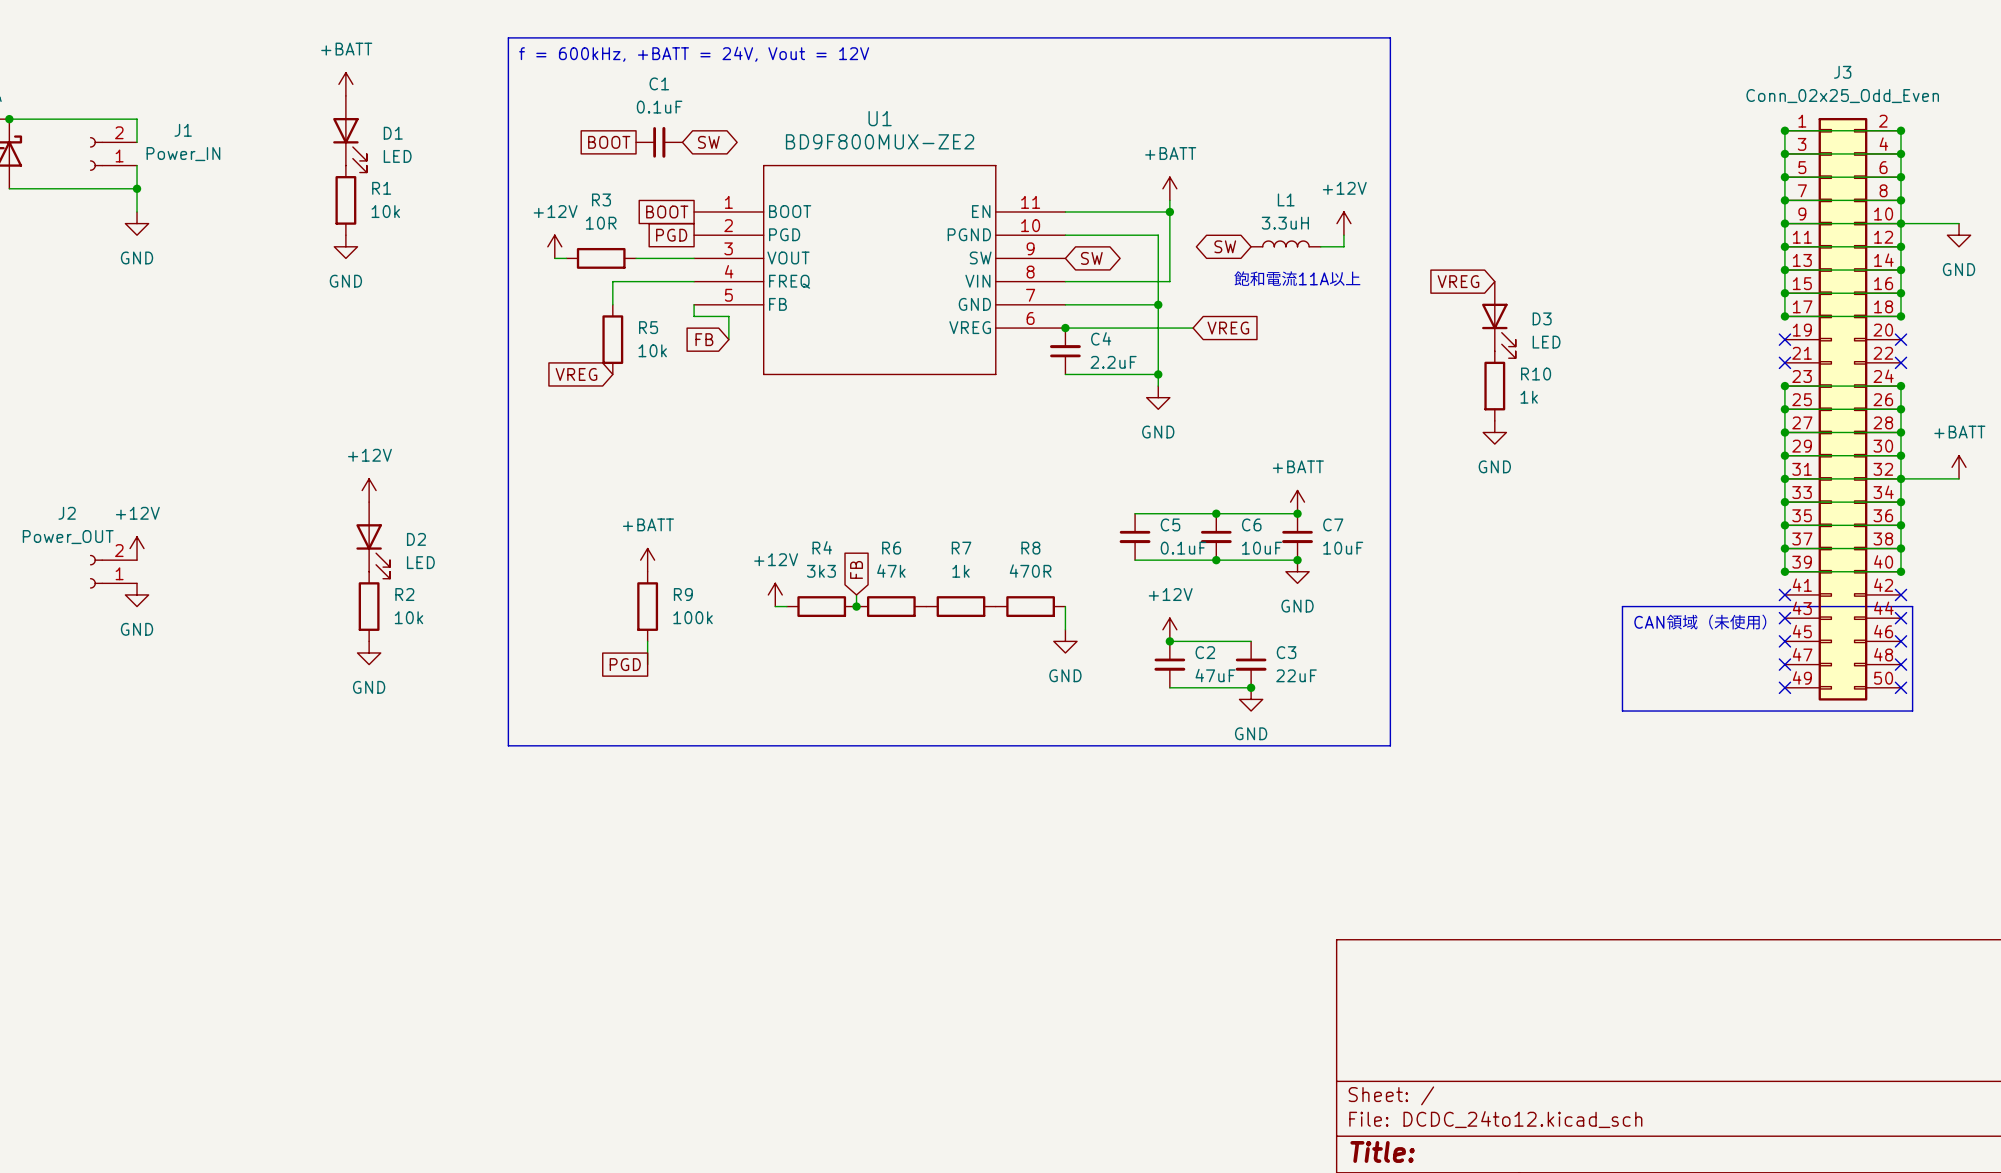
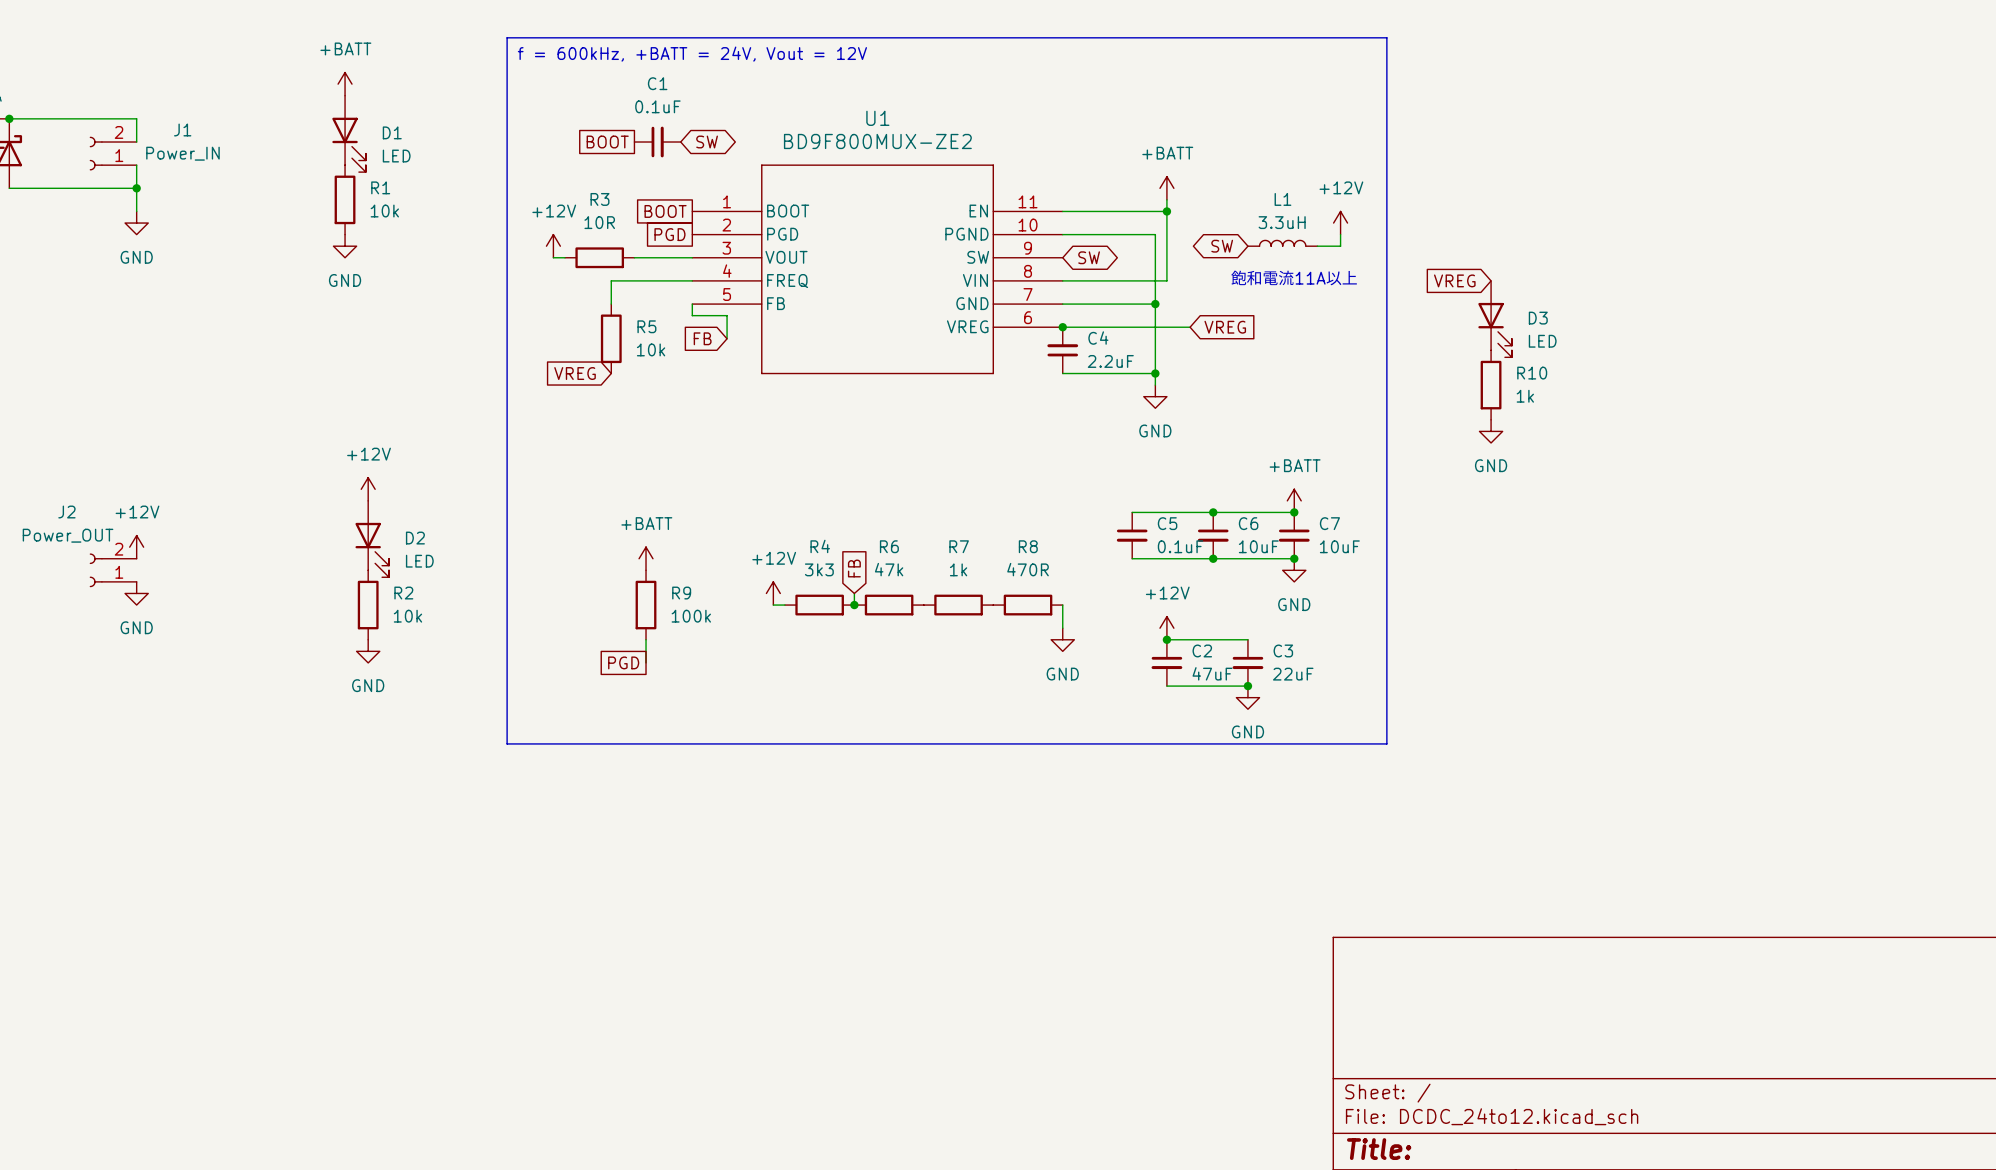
wire: (1784, 130) (1784, 316) (1900, 316) (1900, 130) (1784, 130) -> none
junction: (1784, 130) -> none
junction: (1900, 130) -> none
wire: (1784, 153) (1900, 153) -> none
junction: (1784, 153) -> none
junction: (1900, 153) -> none
wire: (1784, 177) (1900, 177) -> none
junction: (1784, 177) -> none
junction: (1900, 177) -> none
wire: (1784, 200) (1900, 200) -> none
junction: (1784, 200) -> none
junction: (1900, 200) -> none
wire: (1784, 223) (1959, 223) -> none
junction: (1784, 223) -> none
junction: (1900, 223) -> none
power symbol: GND (1959, 235) -> none
wire: (1784, 246) (1900, 246) -> none
junction: (1784, 246) -> none
junction: (1900, 246) -> none
wire: (1784, 270) (1900, 270) -> none
junction: (1784, 270) -> none
junction: (1900, 270) -> none
wire: (1784, 293) (1900, 293) -> none
junction: (1784, 293) -> none
junction: (1900, 293) -> none
junction: (1784, 316) -> none
junction: (1900, 316) -> none
no-connect mark: (1784, 339) -> none
no-connect mark: (1900, 339) -> none
no-connect mark: (1784, 362) -> none
no-connect mark: (1900, 362) -> none
wire: (1784, 386) (1784, 571) (1900, 571) (1900, 386) (1784, 386) -> none
junction: (1784, 386) -> none
junction: (1900, 386) -> none
wire: (1784, 409) (1900, 409) -> none
junction: (1784, 409) -> none
J3: Conn_02x25_Odd_Even (1842, 409) -> none
junction: (1900, 409) -> none
wire: (1784, 432) (1900, 432) -> none
junction: (1784, 432) -> none
junction: (1900, 432) -> none
wire: (1784, 455) (1900, 455) -> none
junction: (1784, 455) -> none
junction: (1900, 455) -> none
power symbol: +BATT (1959, 467) -> none
wire: (1784, 478) (1959, 478) -> none
junction: (1784, 478) -> none
junction: (1900, 478) -> none
wire: (1784, 502) (1900, 502) -> none
junction: (1784, 502) -> none
junction: (1900, 502) -> none
wire: (1784, 525) (1900, 525) -> none
junction: (1784, 525) -> none
junction: (1900, 525) -> none
wire: (1784, 548) (1900, 548) -> none
junction: (1784, 548) -> none
junction: (1900, 548) -> none
junction: (1784, 571) -> none
junction: (1900, 571) -> none
no-connect mark: (1784, 594) -> none
no-connect mark: (1900, 594) -> none
line: (1622, 606) (1912, 606) (1912, 711) (1622, 711) (1622, 606) -> none
no-connect mark: (1784, 618) -> none
no-connect mark: (1900, 618) -> none
text: CAN領域（未使用） (1700, 622) -> none
no-connect mark: (1784, 641) -> none
no-connect mark: (1900, 641) -> none
no-connect mark: (1784, 664) -> none
no-connect mark: (1900, 664) -> none
no-connect mark: (1784, 687) -> none
no-connect mark: (1900, 687) -> none

